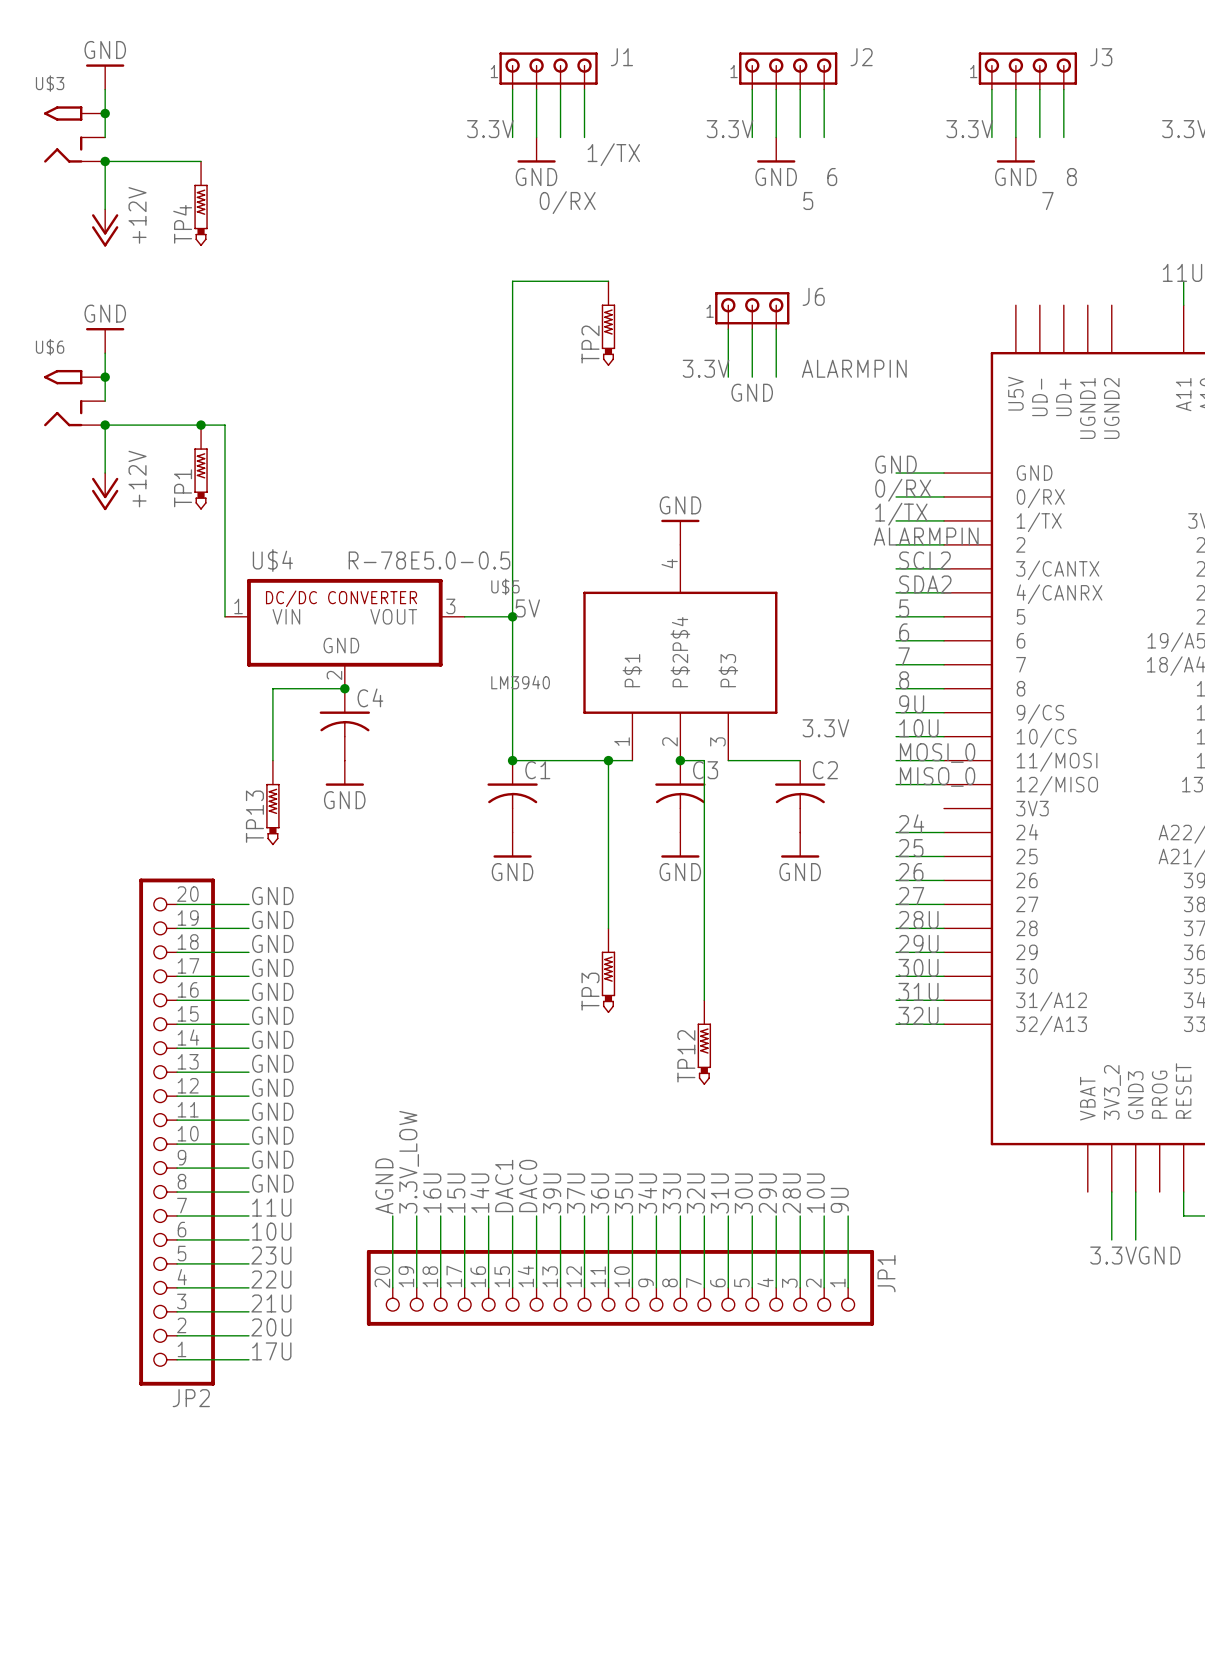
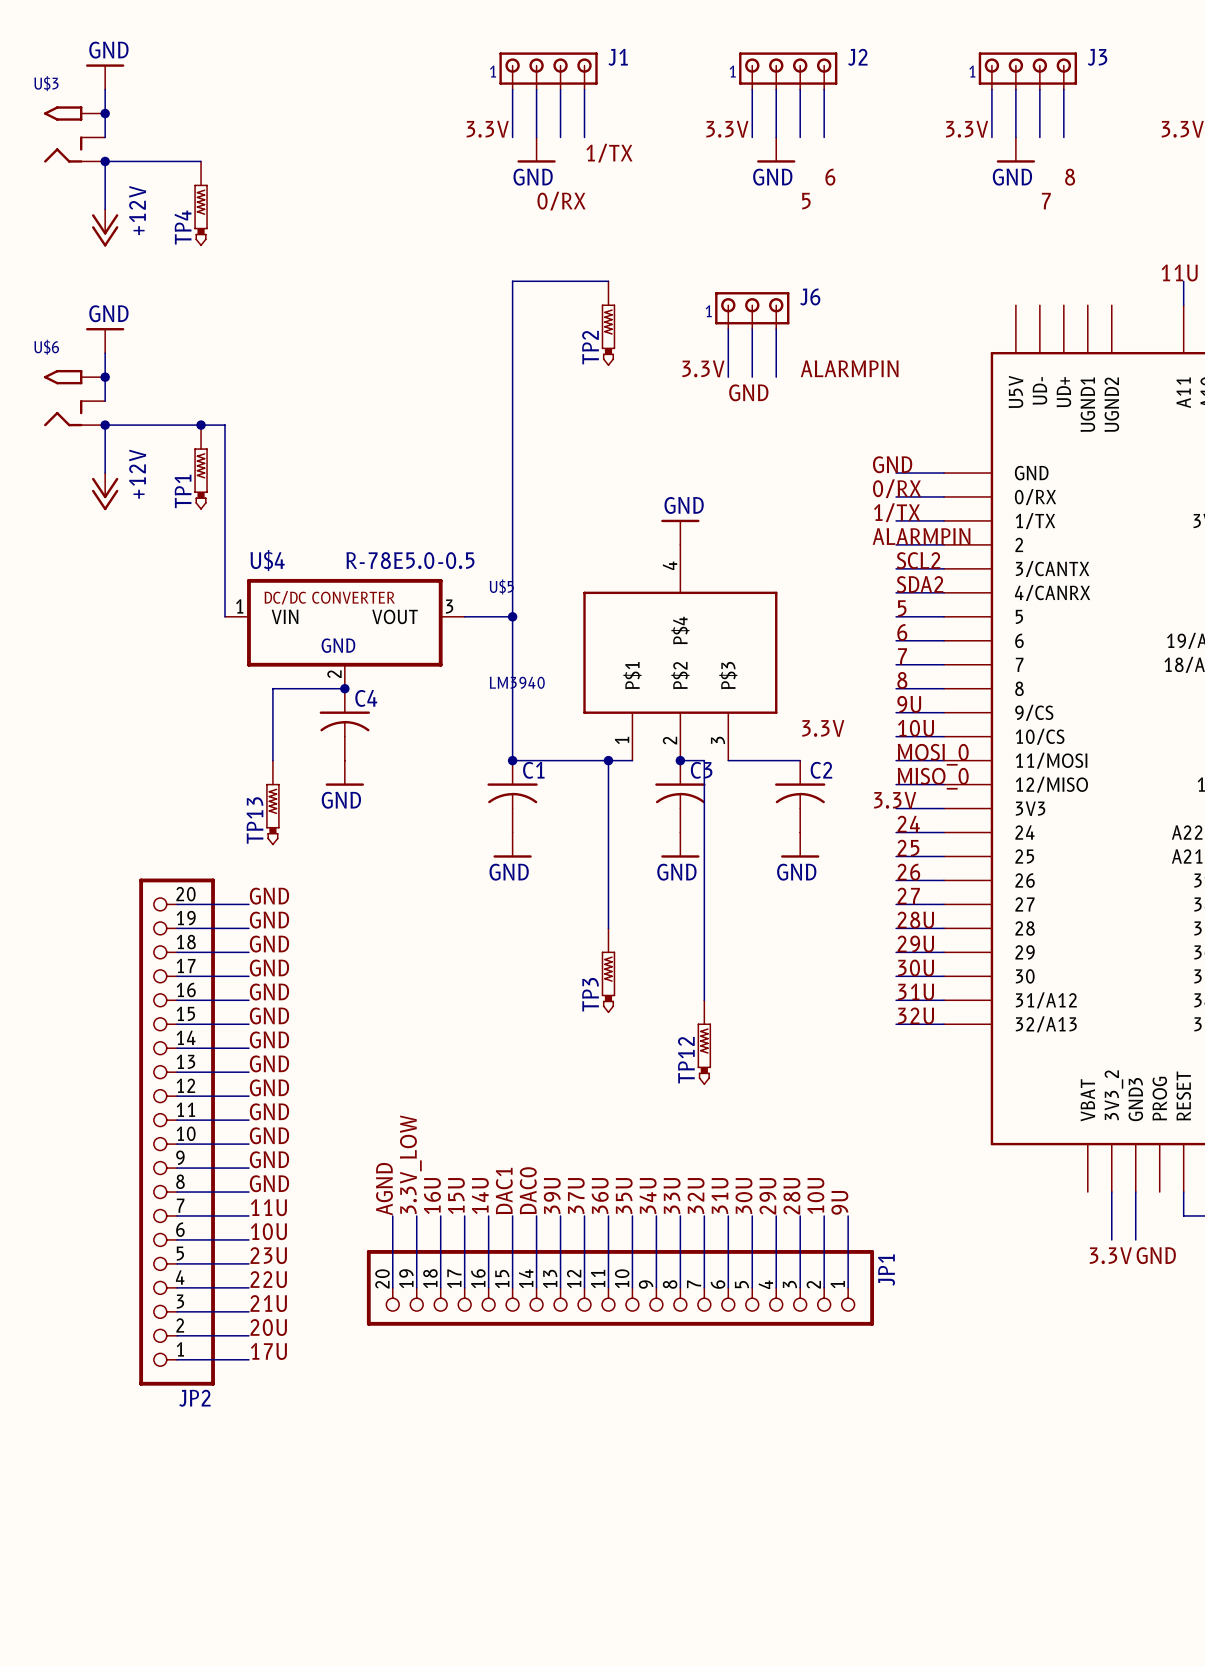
label: 5V (527, 608) -> none
label: none -> 3.3V (895, 800)
wire: none -> (896, 808) (944, 808)

